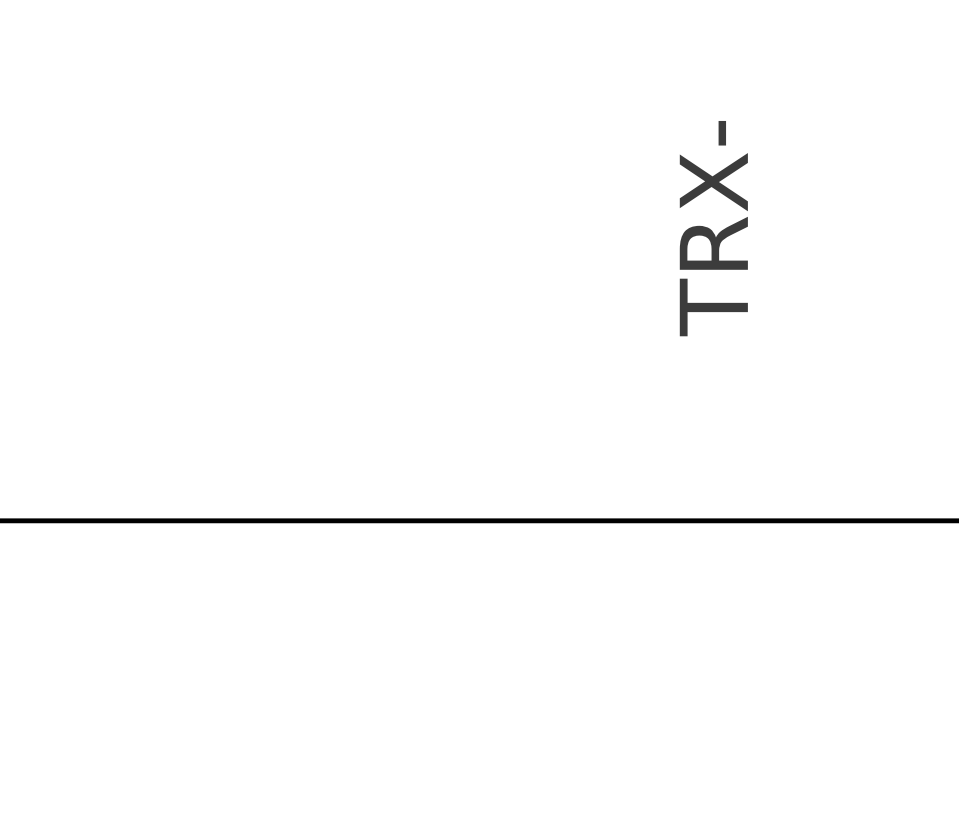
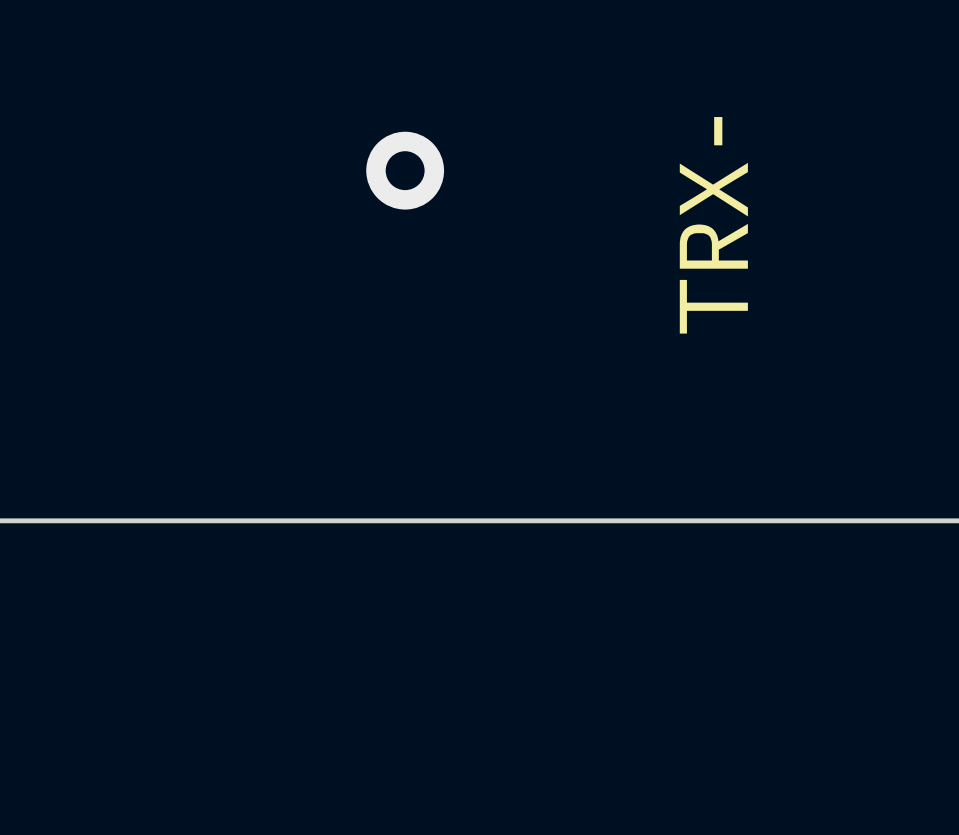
via: none -> (405, 170)

